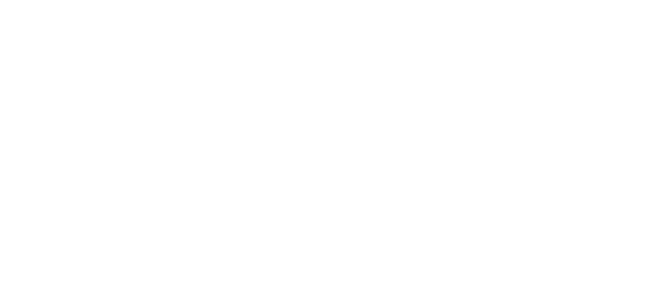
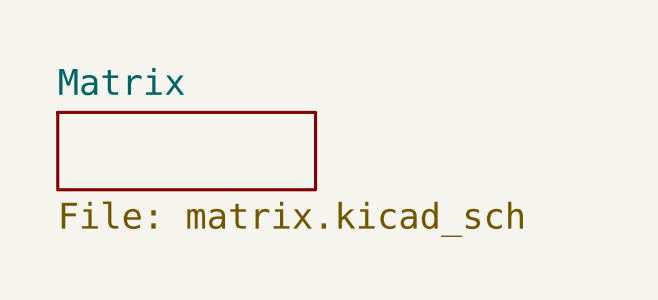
sheet Matrix: none -> File: matrix.kicad_sch (186, 151)

